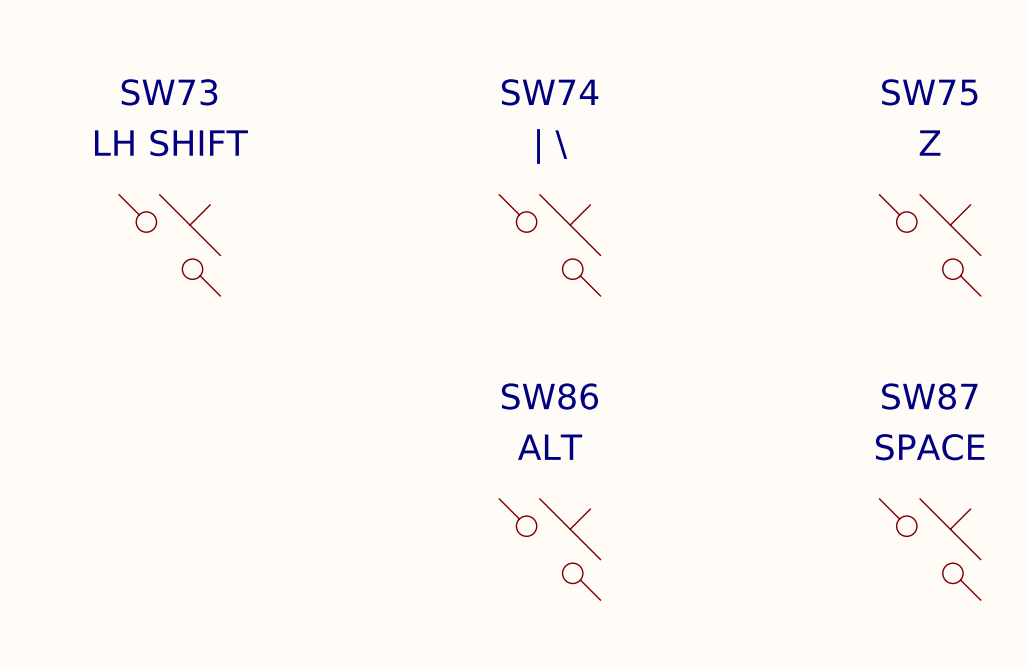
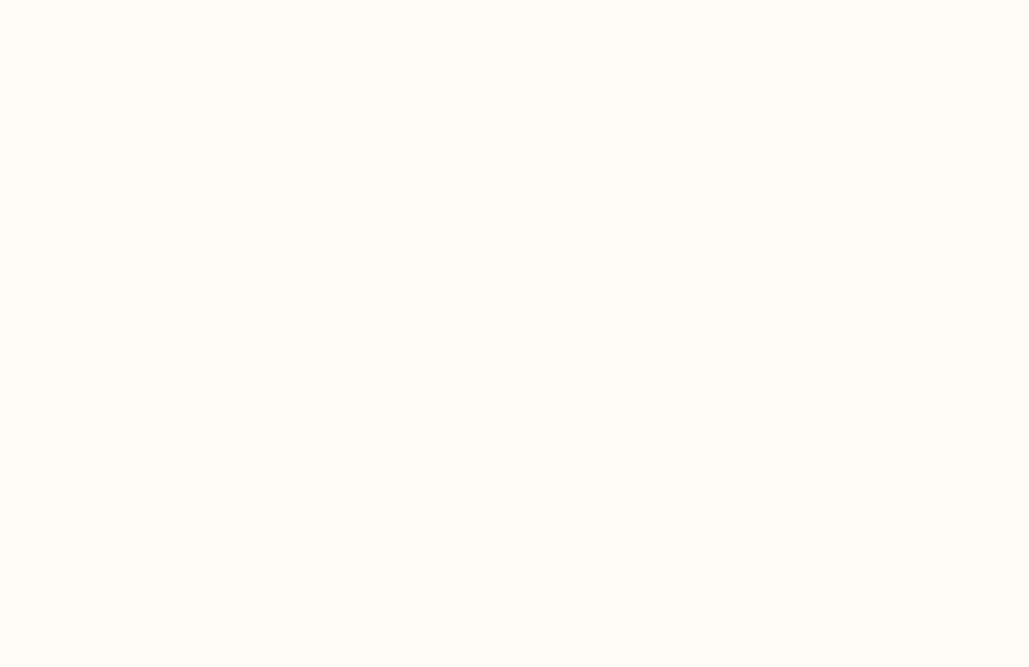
SW73: LH SHIFT (169, 245) -> none
SW74: | \ (549, 245) -> none
SW75: Z (930, 245) -> none
SW86: ALT (549, 549) -> none
SW87: SPACE (930, 549) -> none

